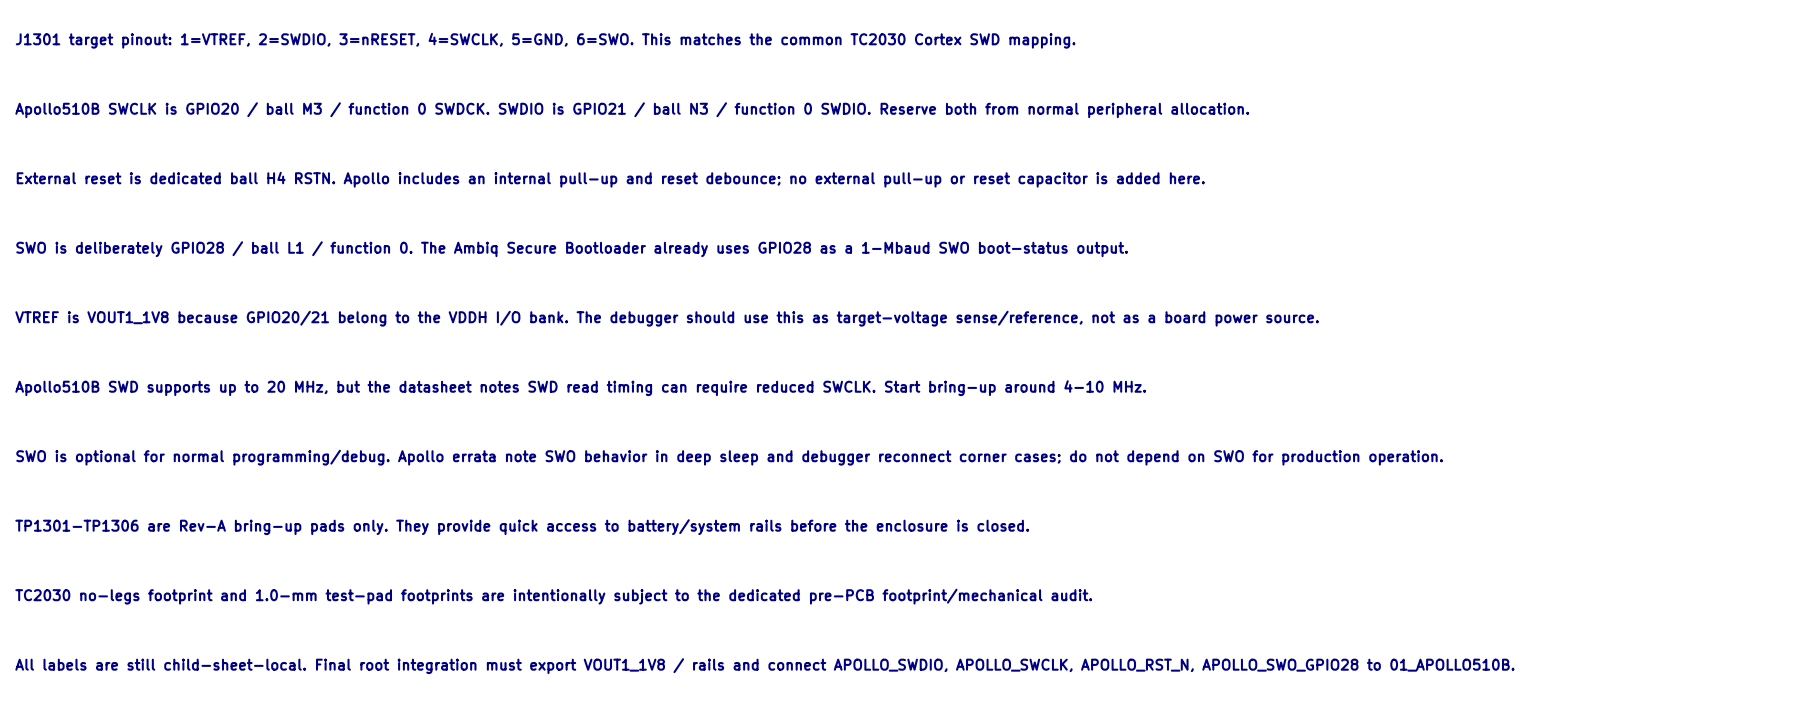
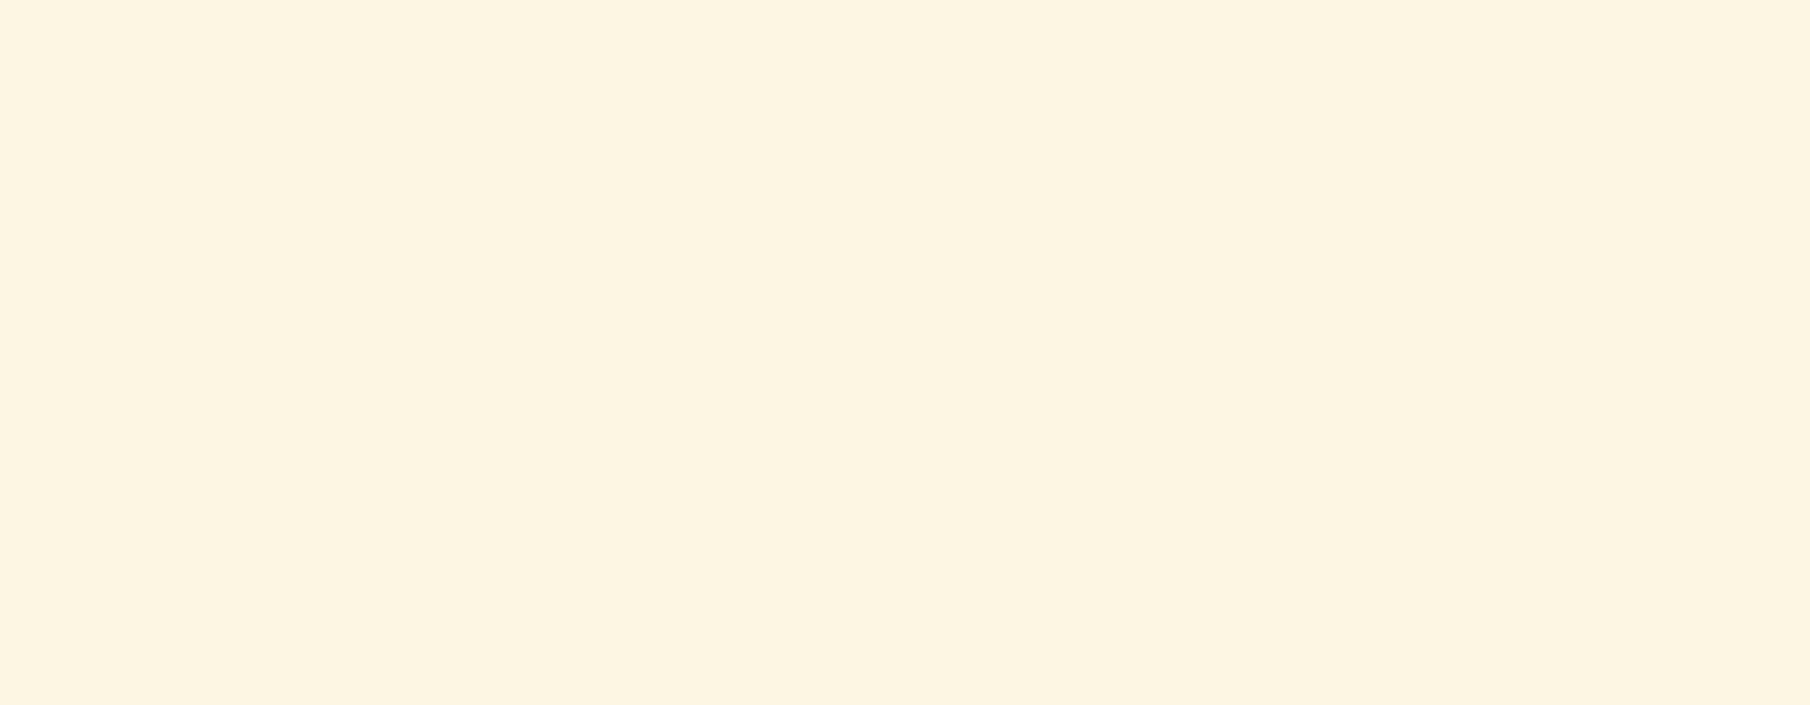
text: J1301 target pinout: 1=VTREF, 2=SWDIO, 3=nRESET, 4=SWCLK, 5=GND, 6=SWO. This matches the common TC2030 Cortex SWD mapping. (545, 40) -> none
text: Apollo510B SWCLK is GPIO20 / ball M3 / function 0 SWDCK. SWDIO is GPIO21 / ball N3 / function 0 SWDIO. Reserve both from normal peripheral allocation. (632, 110) -> none
text: External reset is dedicated ball H4 RSTN. Apollo includes an internal pull-up and reset debounce; no external pull-up or reset capacitor is added here. (610, 179) -> none
text: SWO is deliberately GPIO28 / ball L1 / function 0. The Ambiq Secure Bootloader already uses GPIO28 as a 1-Mbaud SWO boot-status output. (572, 249) -> none
text: VTREF is VOUT1_1V8 because GPIO20/21 belong to the VDDH I/O bank. The debugger should use this as target-voltage sense/reference, not as a board power source. (667, 318) -> none
text: Apollo510B SWD supports up to 20 MHz, but the datasheet notes SWD read timing can require reduced SWCLK. Start bring-up around 4-10 MHz. (580, 388) -> none
text: SWO is optional for normal programming/debug. Apollo errata note SWO behavior in deep sleep and debugger reconnect corner cases; do not depend on SWO for production operation. (729, 457) -> none
text: TP1301-TP1306 are Rev-A bring-up pads only. They provide quick access to battery/system rails before the enclosure is closed. (522, 527) -> none
text: TC2030 no-legs footprint and 1.0-mm test-pad footprints are intentionally subject to the dedicated pre-PCB footprint/mechanical audit. (553, 596) -> none
text: All labels are still child-sheet-local. Final root integration must export VOUT1_1V8 / rails and connect APOLLO_SWDIO, APOLLO_SWCLK, APOLLO_RST_N, APOLLO_SWO_GPIO28 to 01_APOLLO510B. (764, 666) -> none

